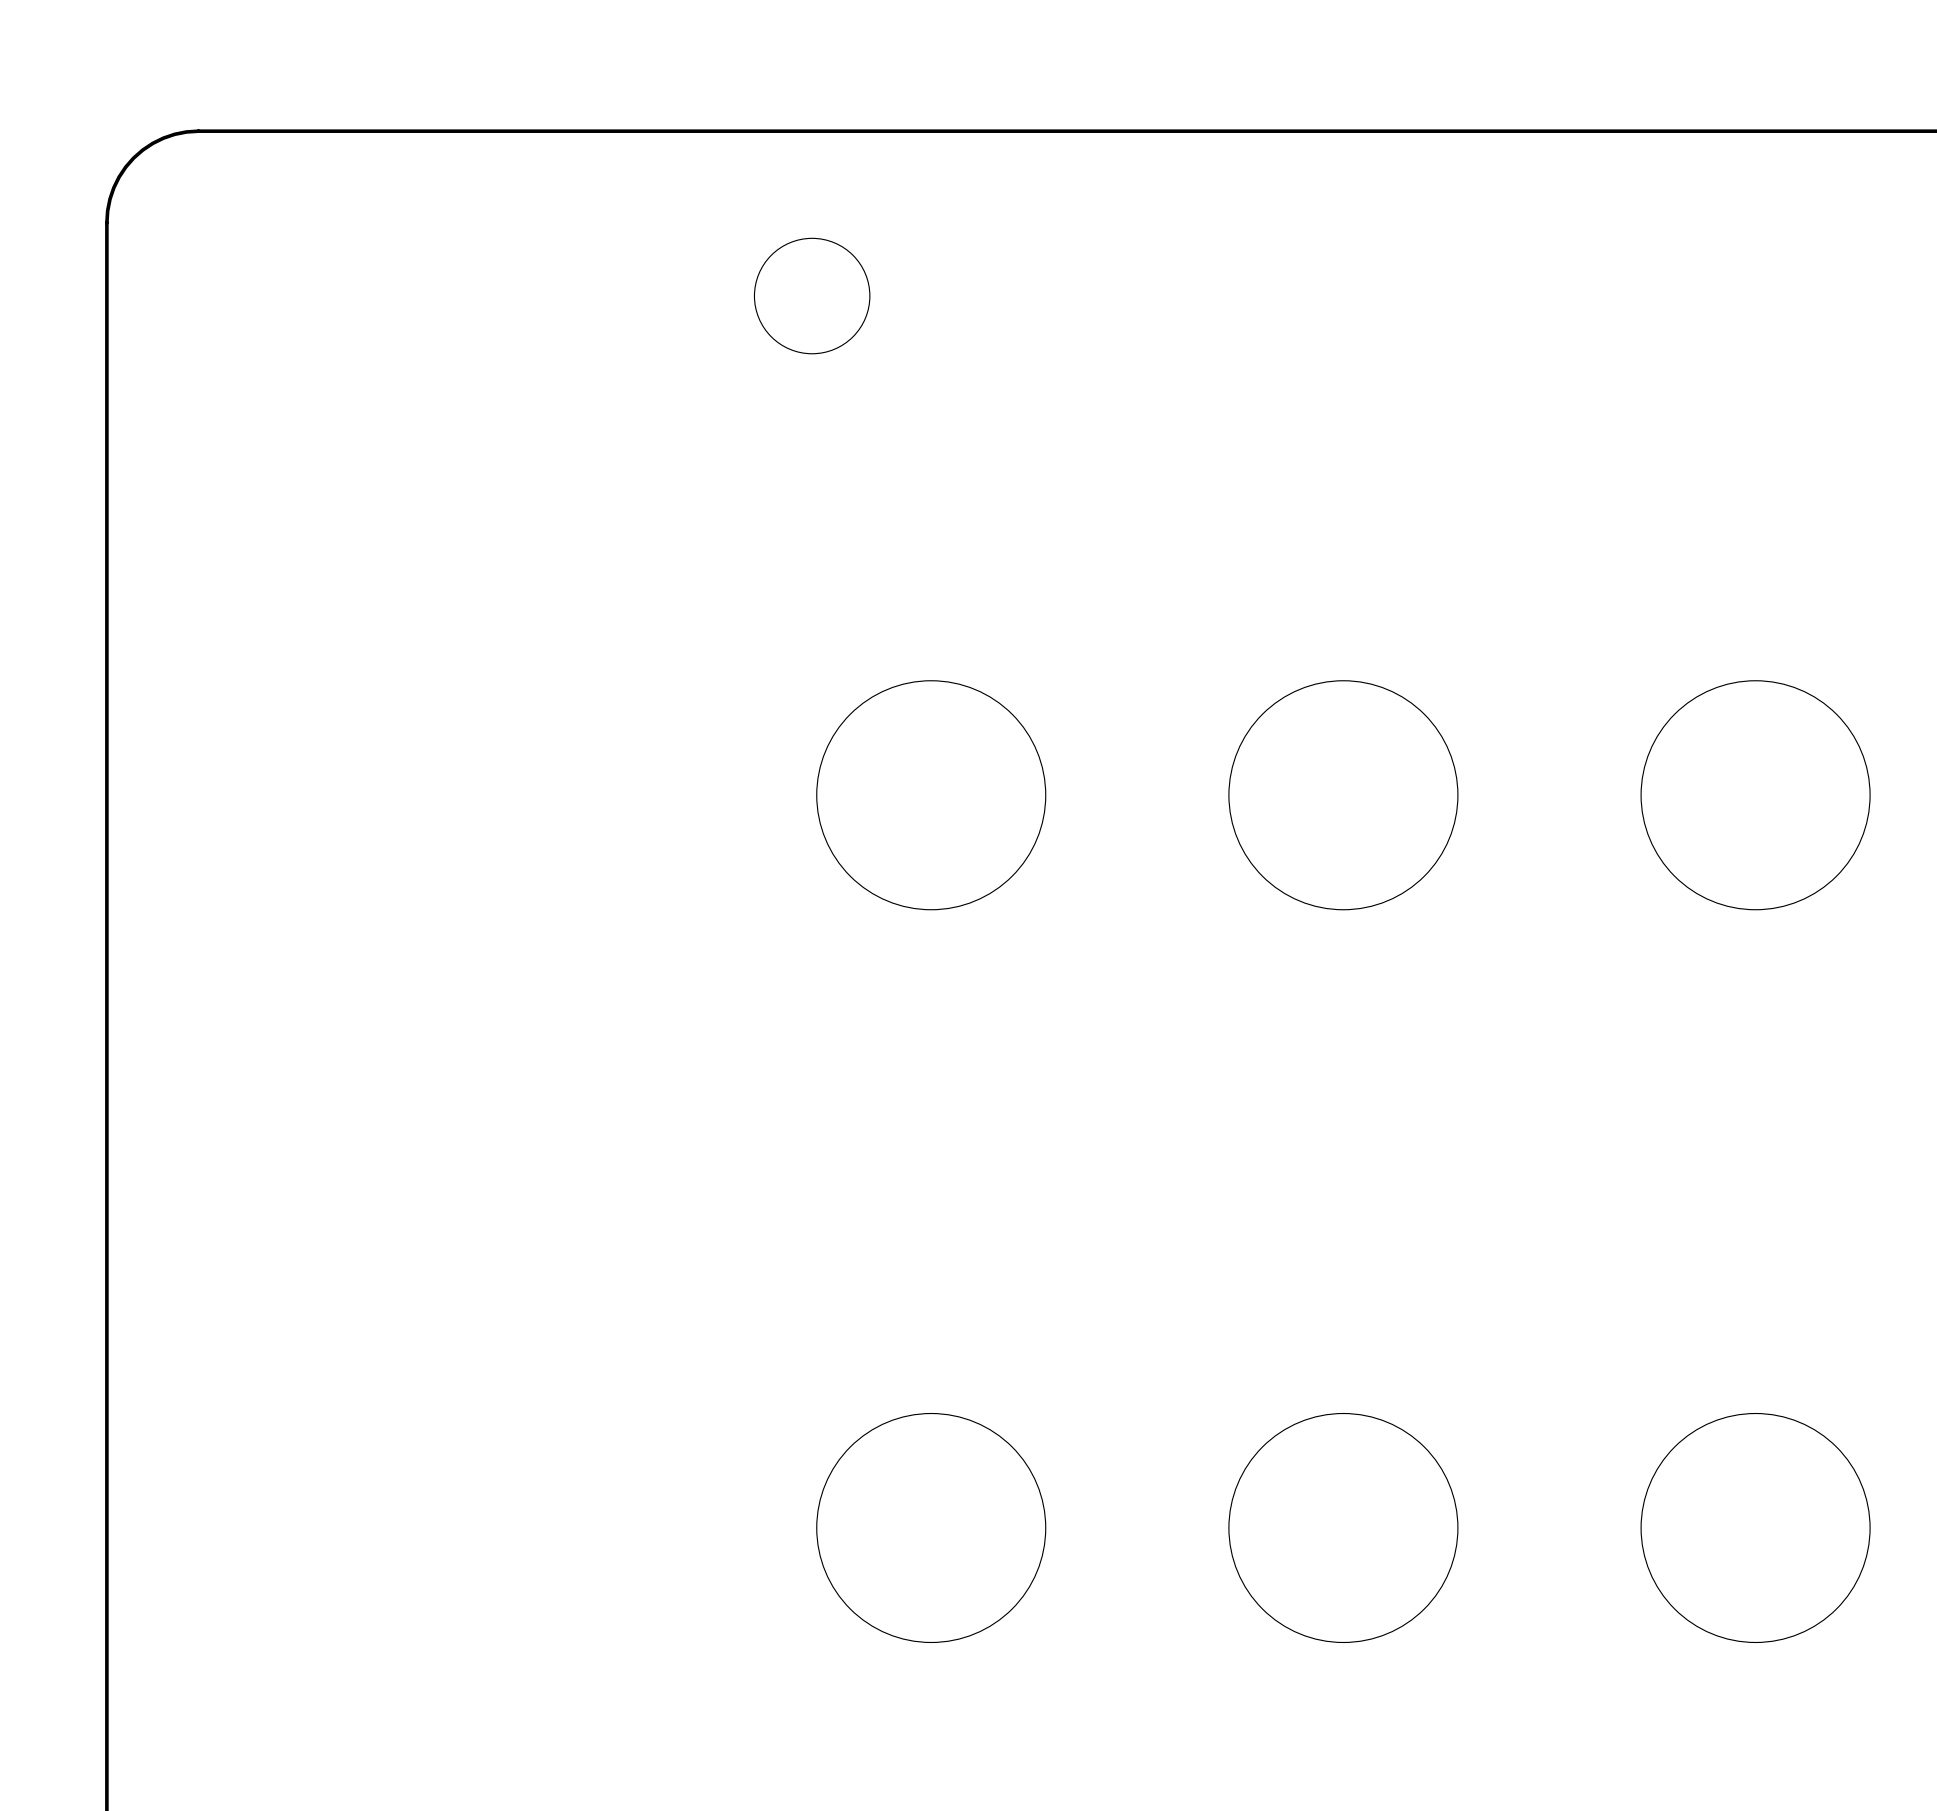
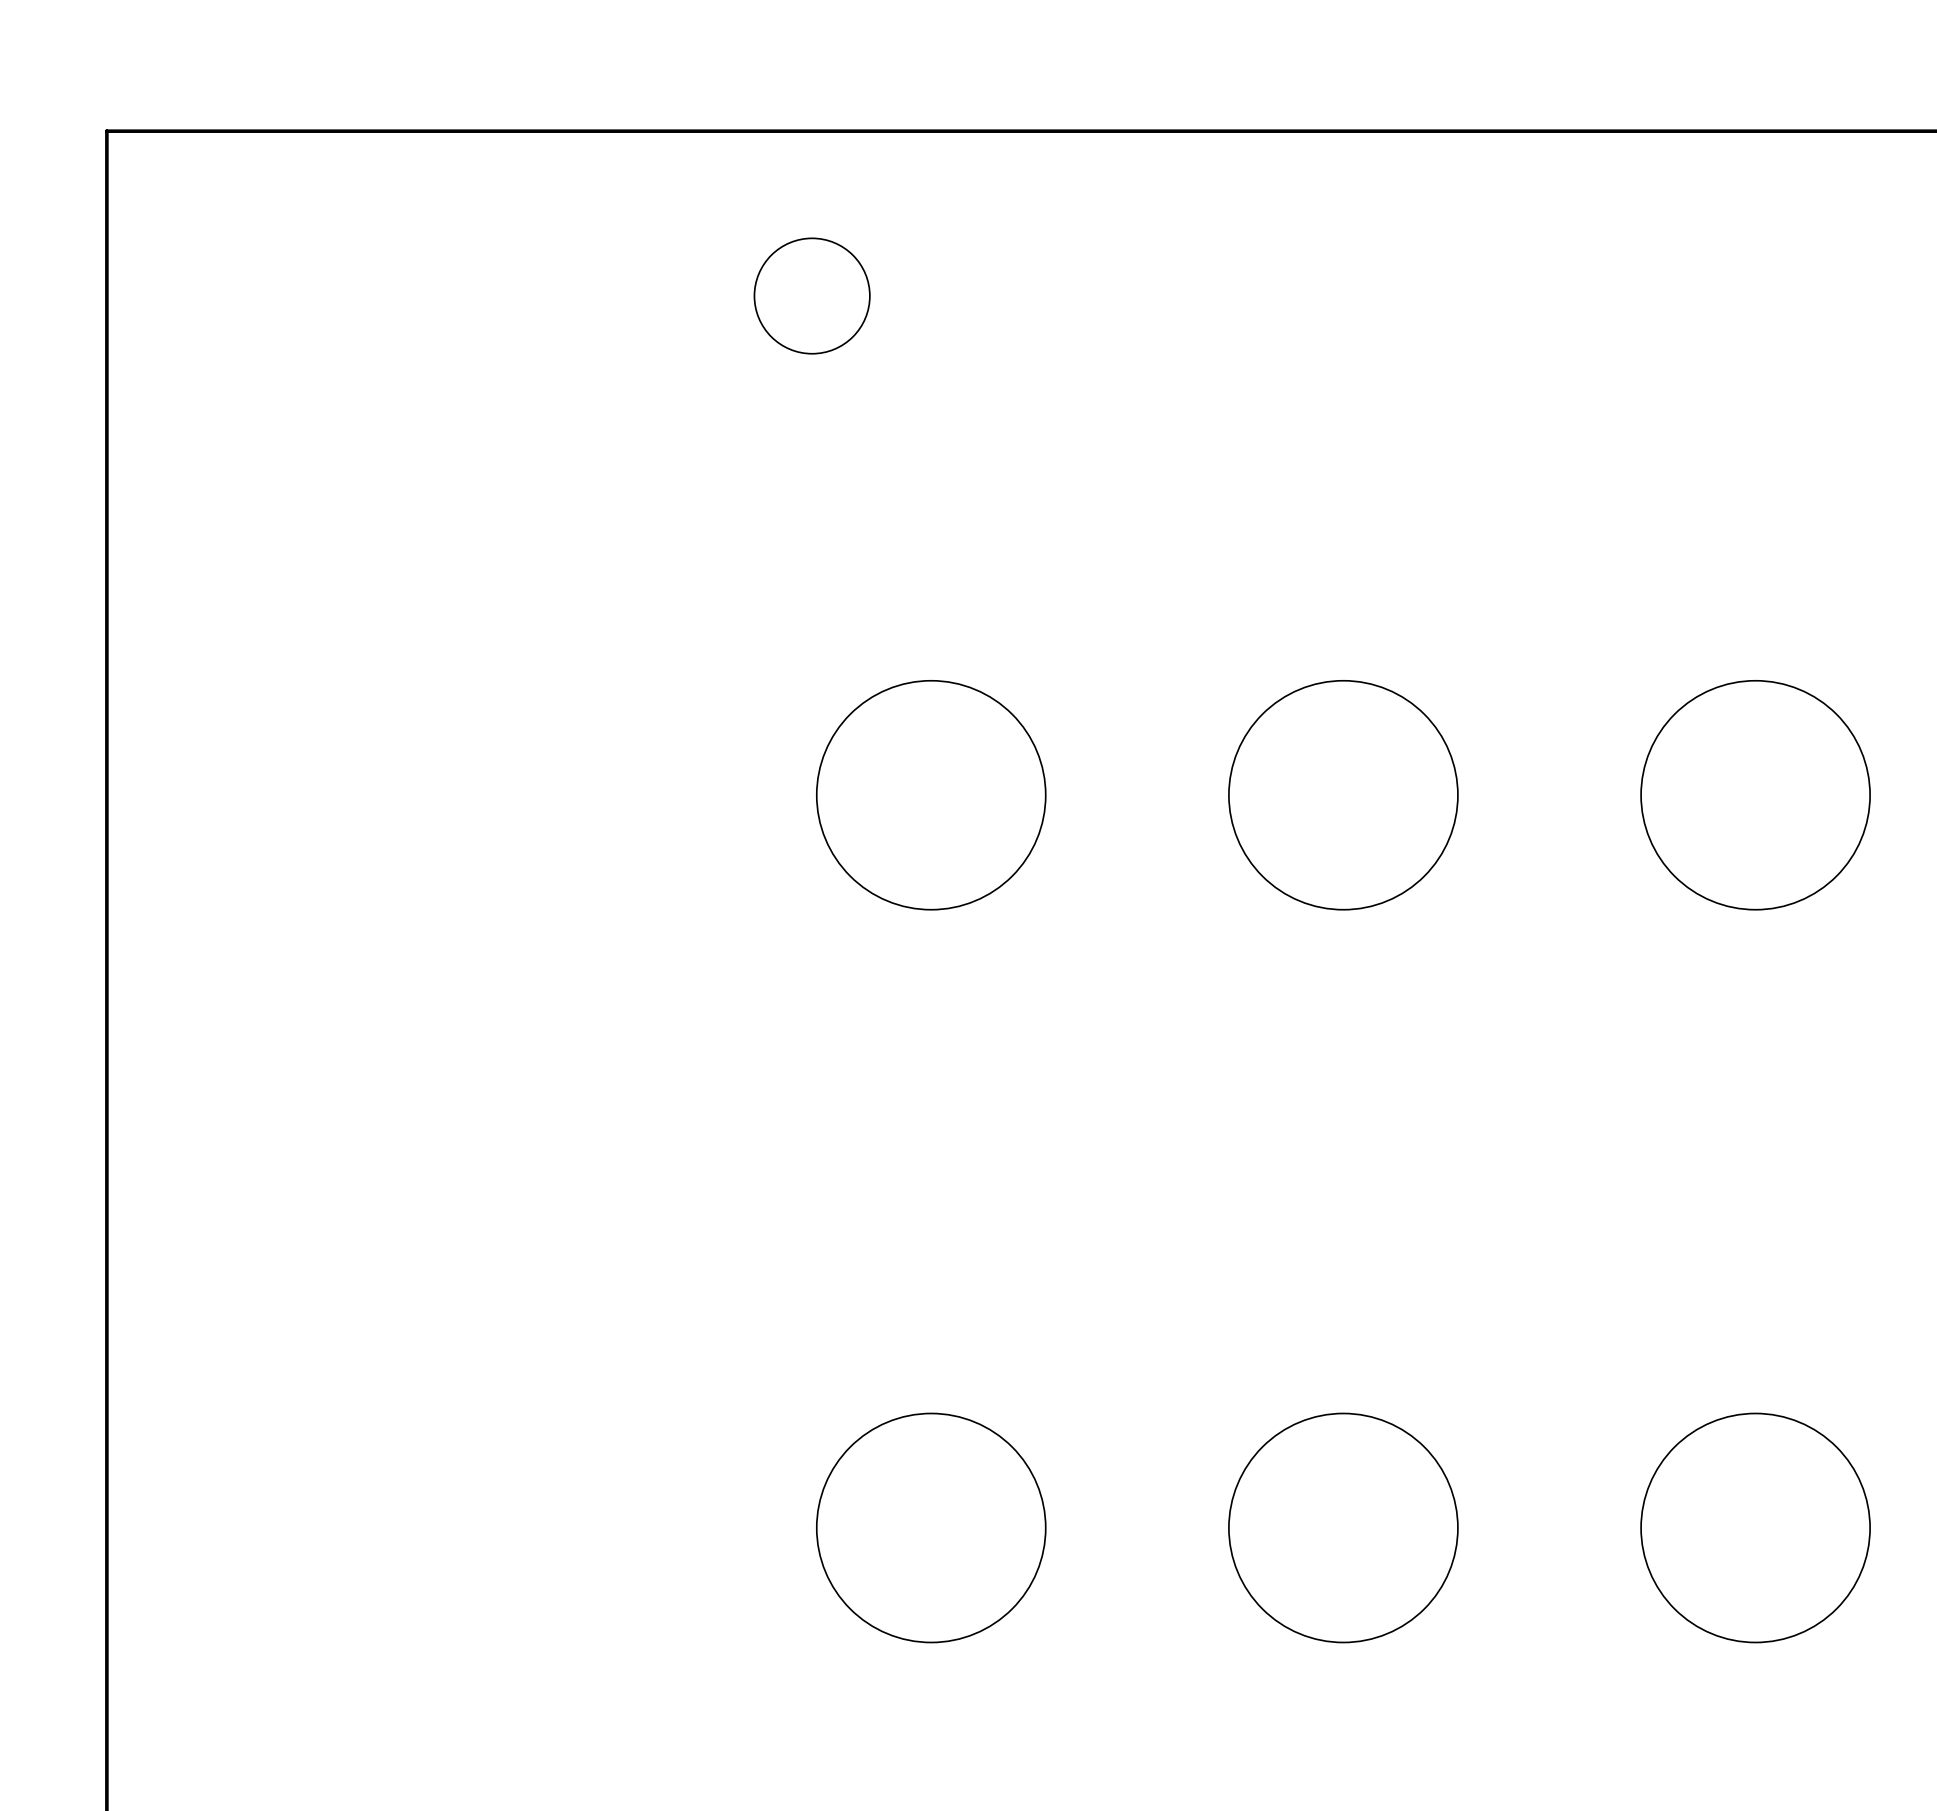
board edge: (198, 131) (186, 131) (163, 138) (152, 143) (133, 158) (119, 176) (113, 187) (107, 210) (106, 222) -> (198, 131) (106, 131) (106, 222)

